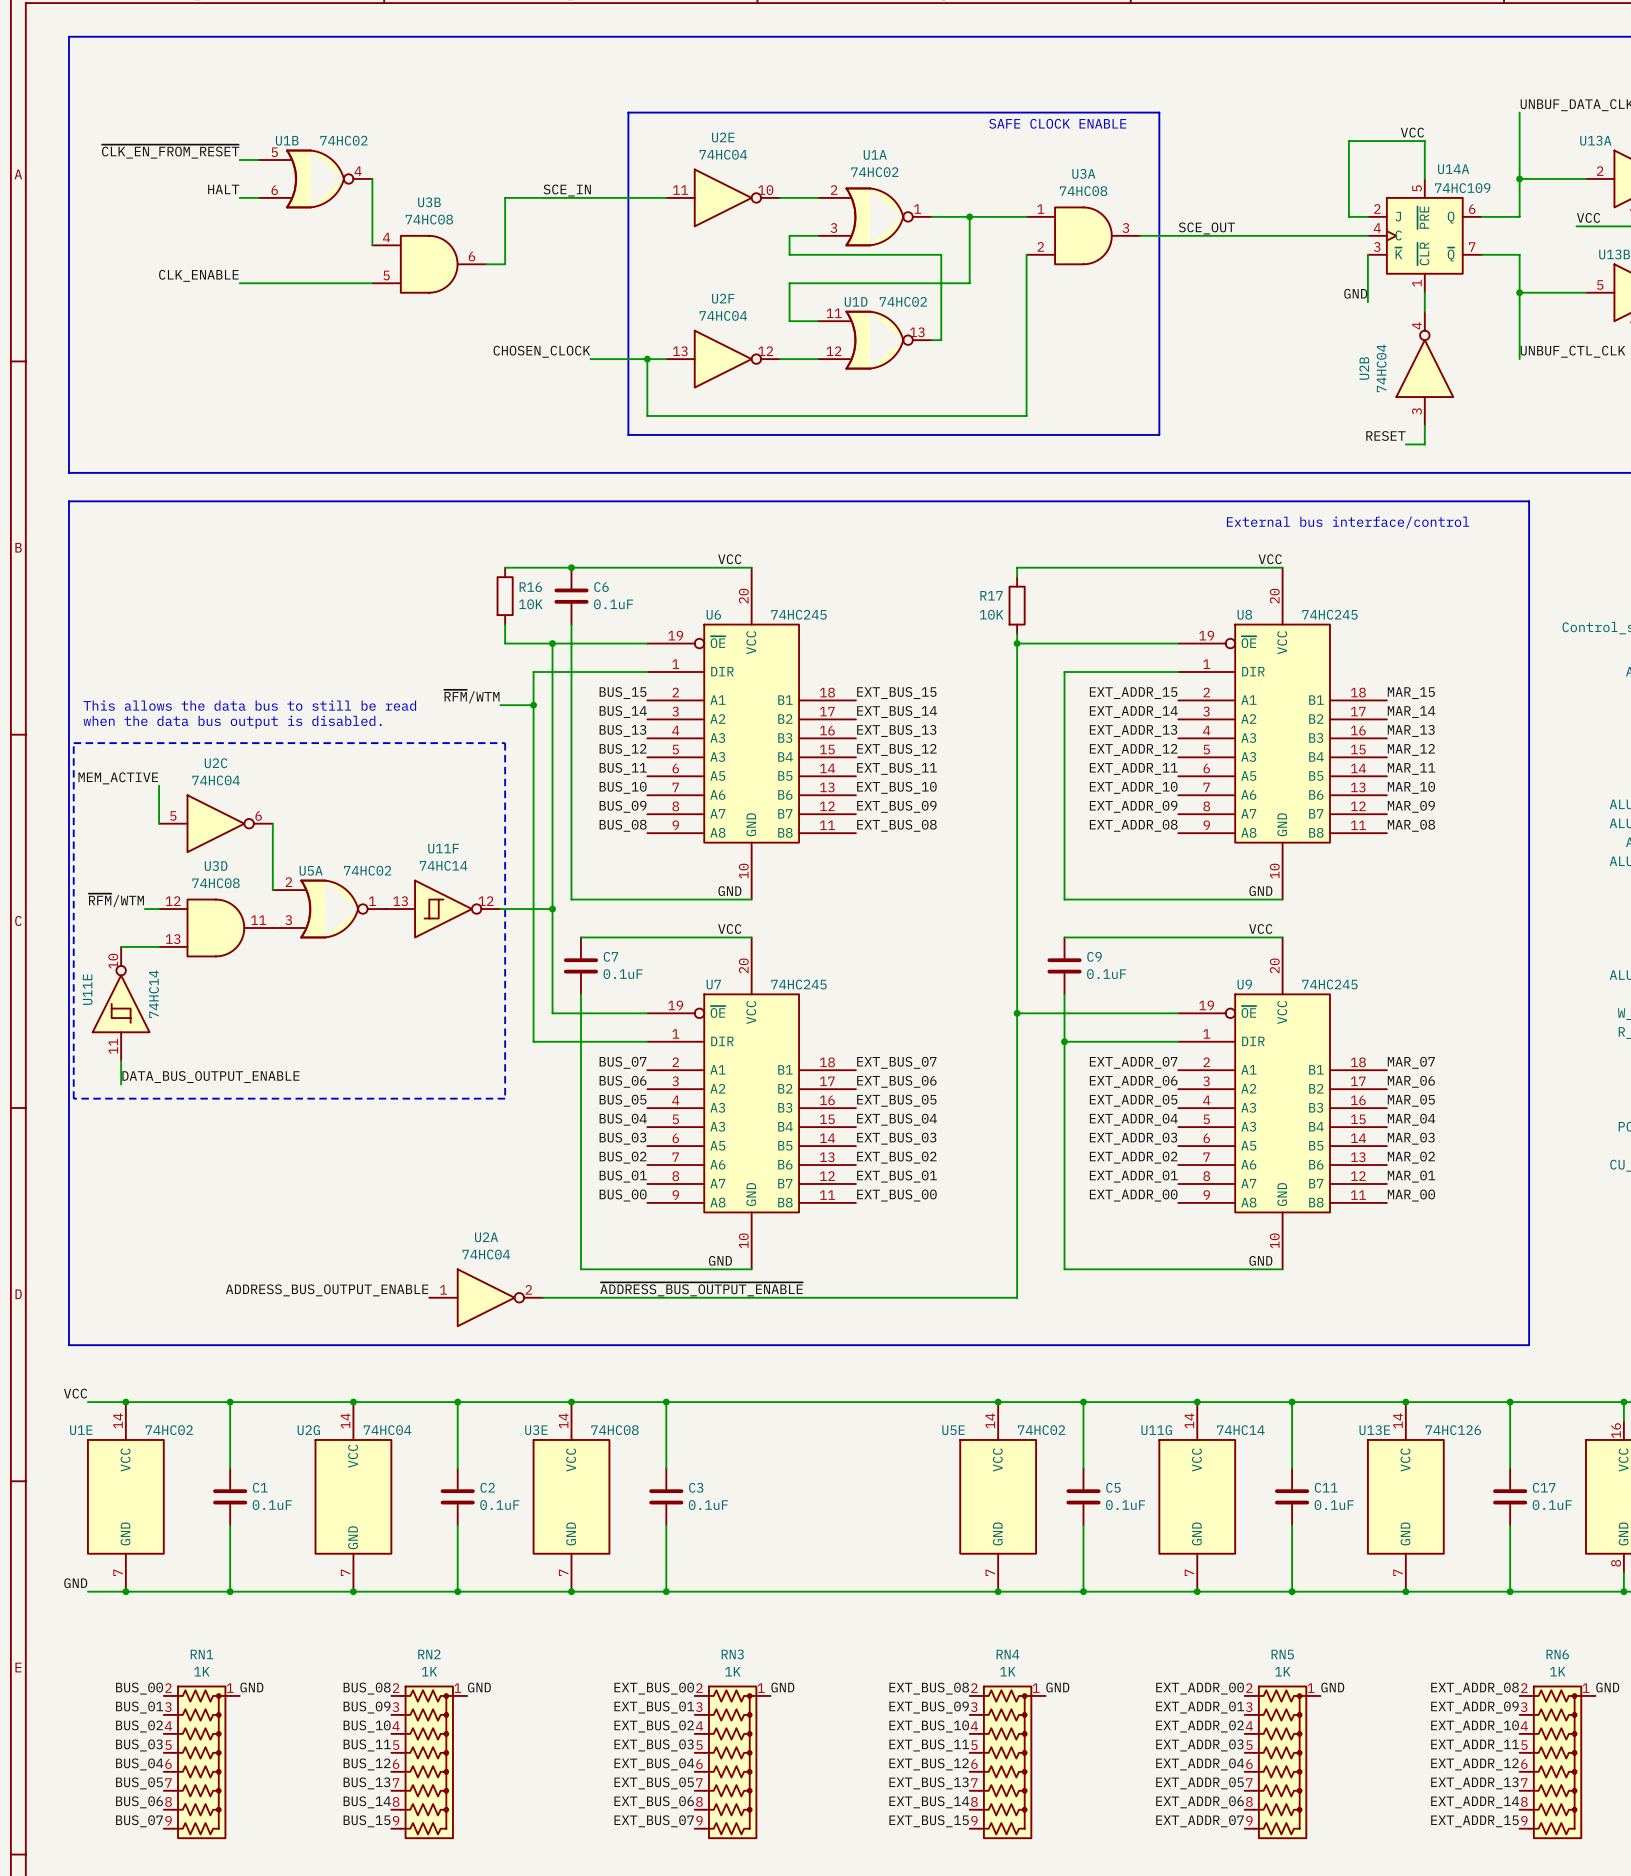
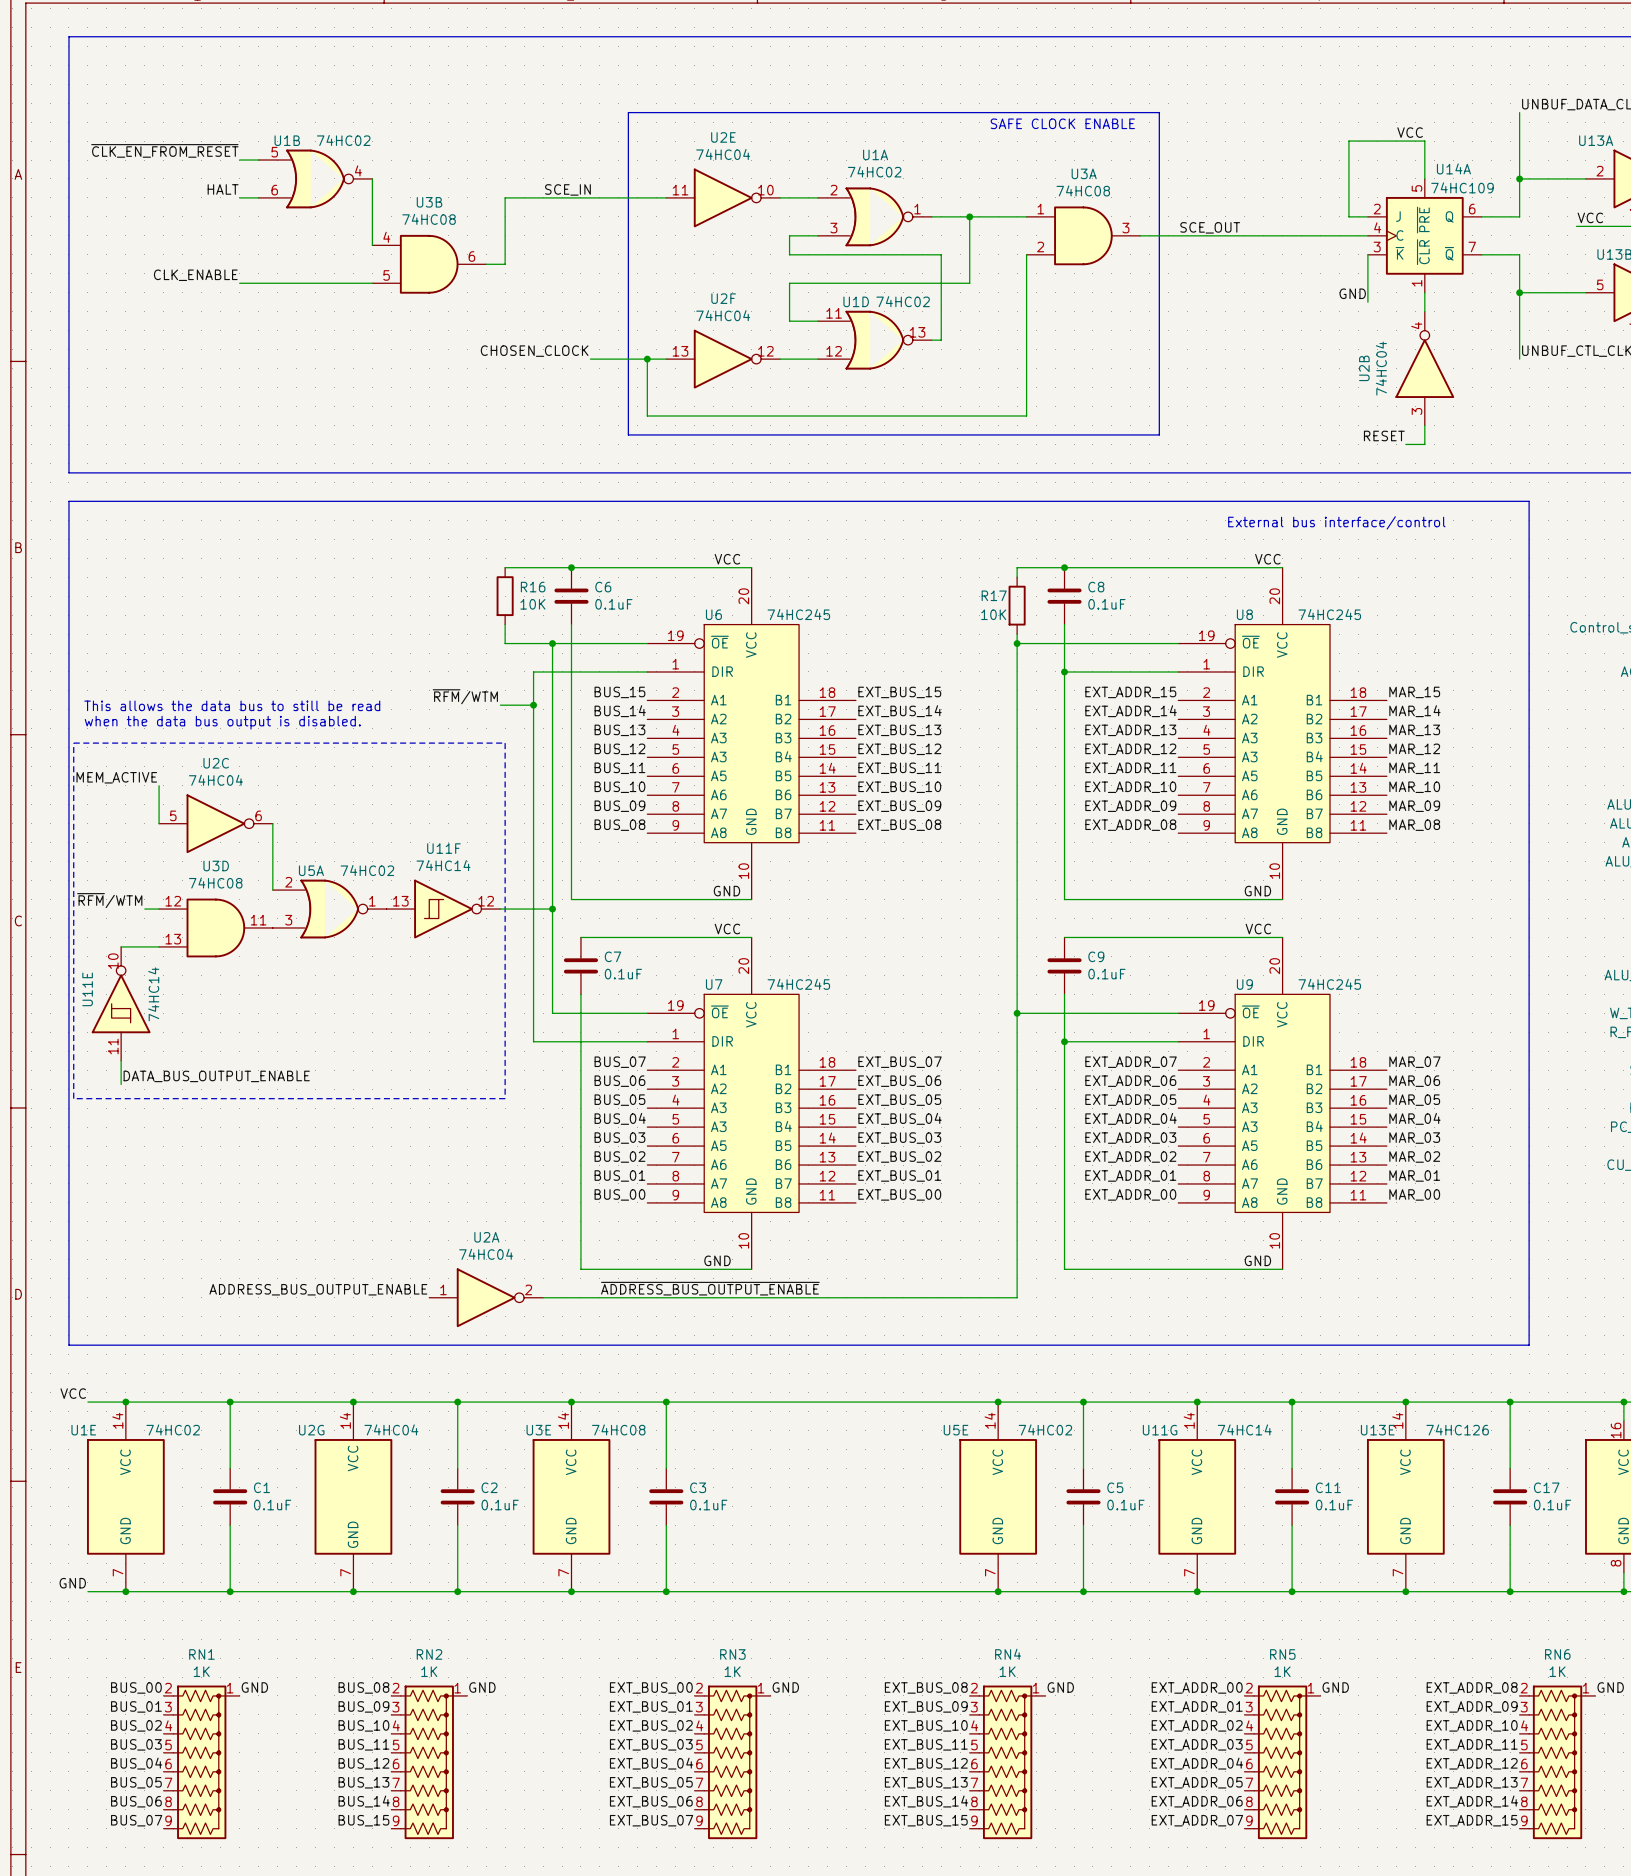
junction: none -> (1064, 567)
C8: none -> 0.1uF (1064, 596)
wire: none -> (1064, 624) (1064, 671)
junction: none -> (1064, 671)

